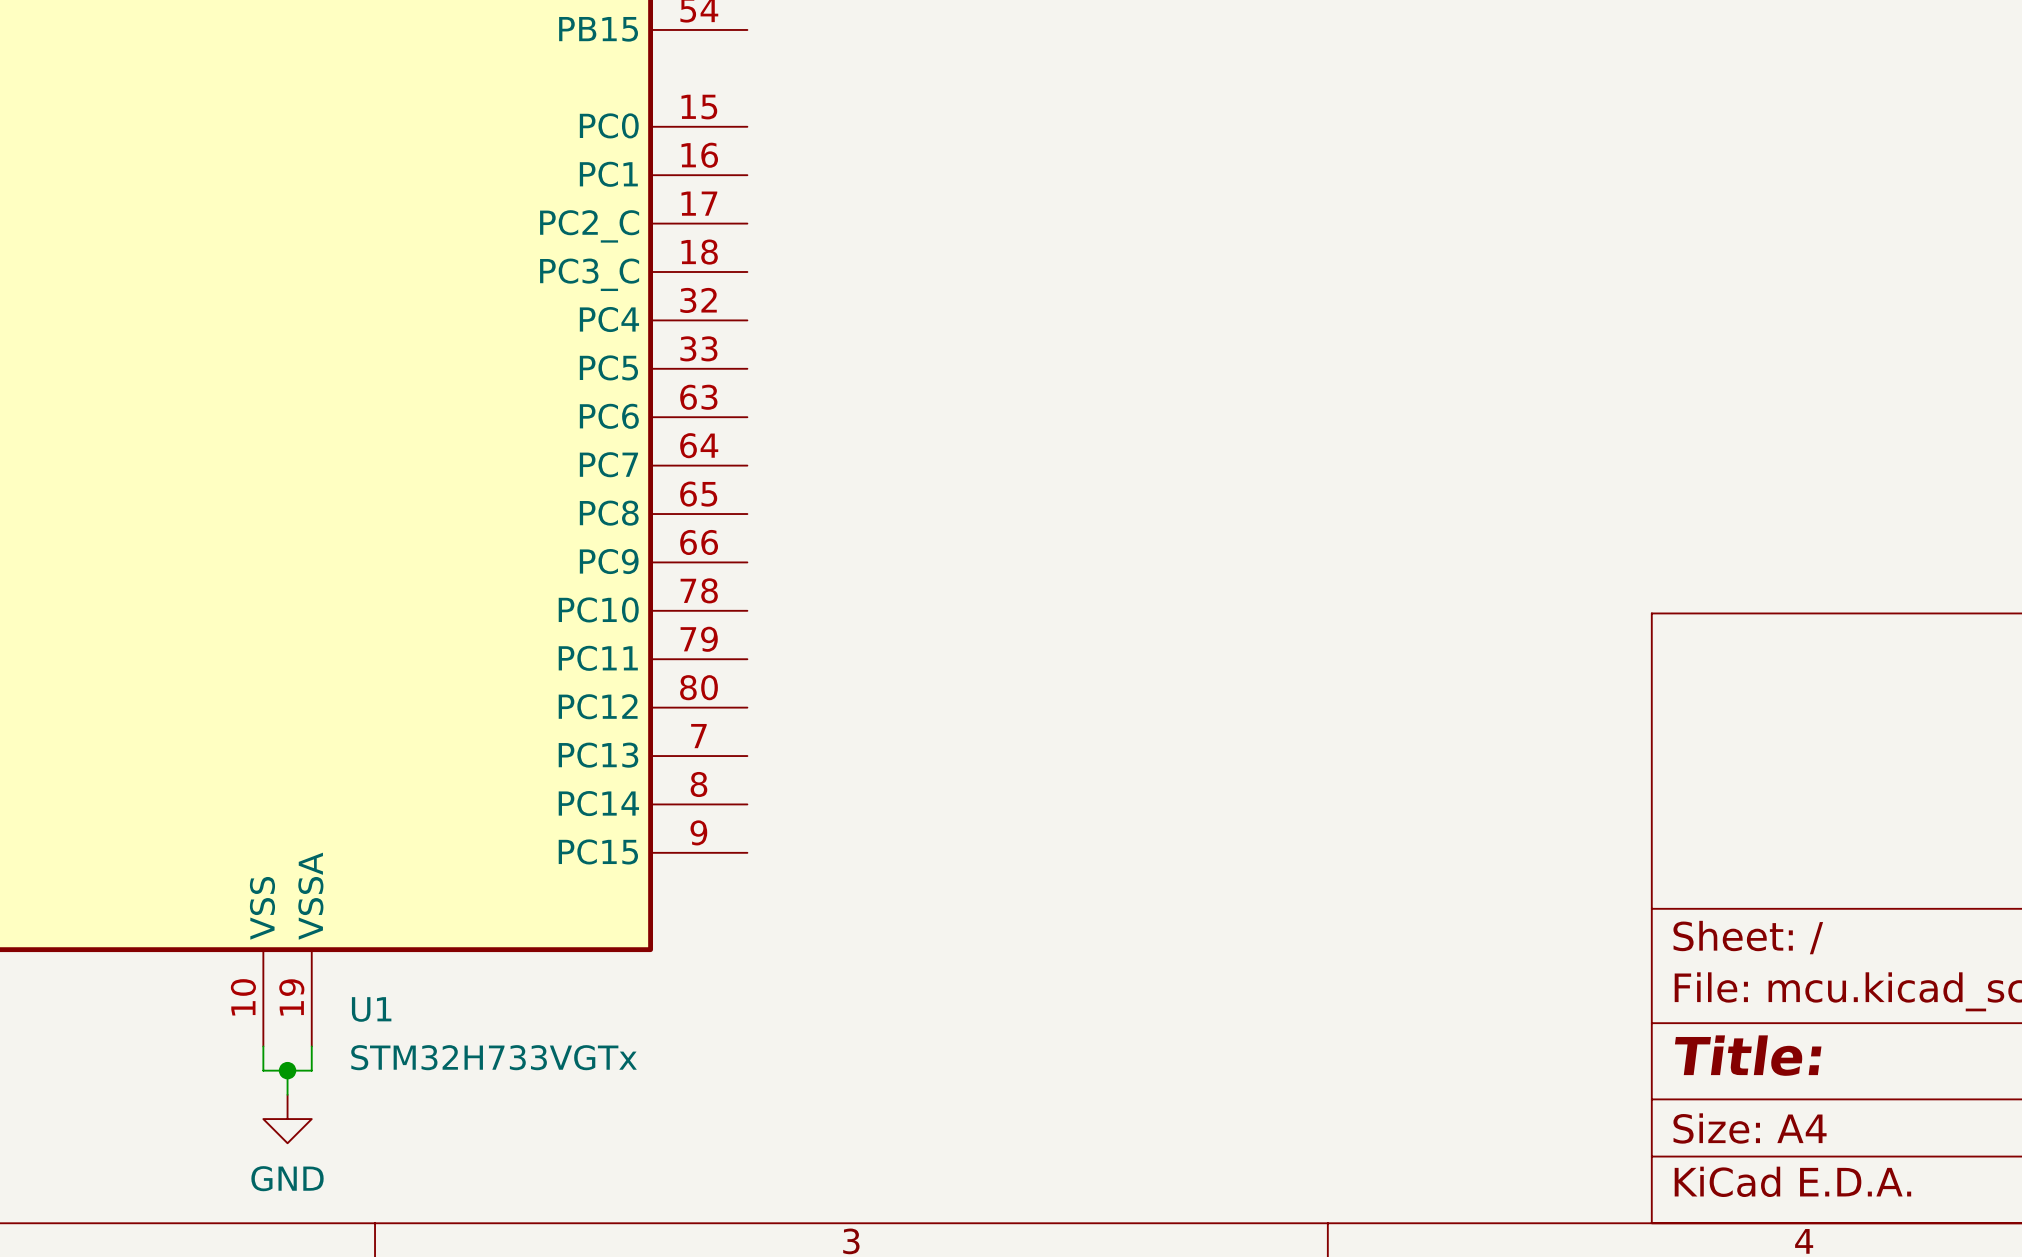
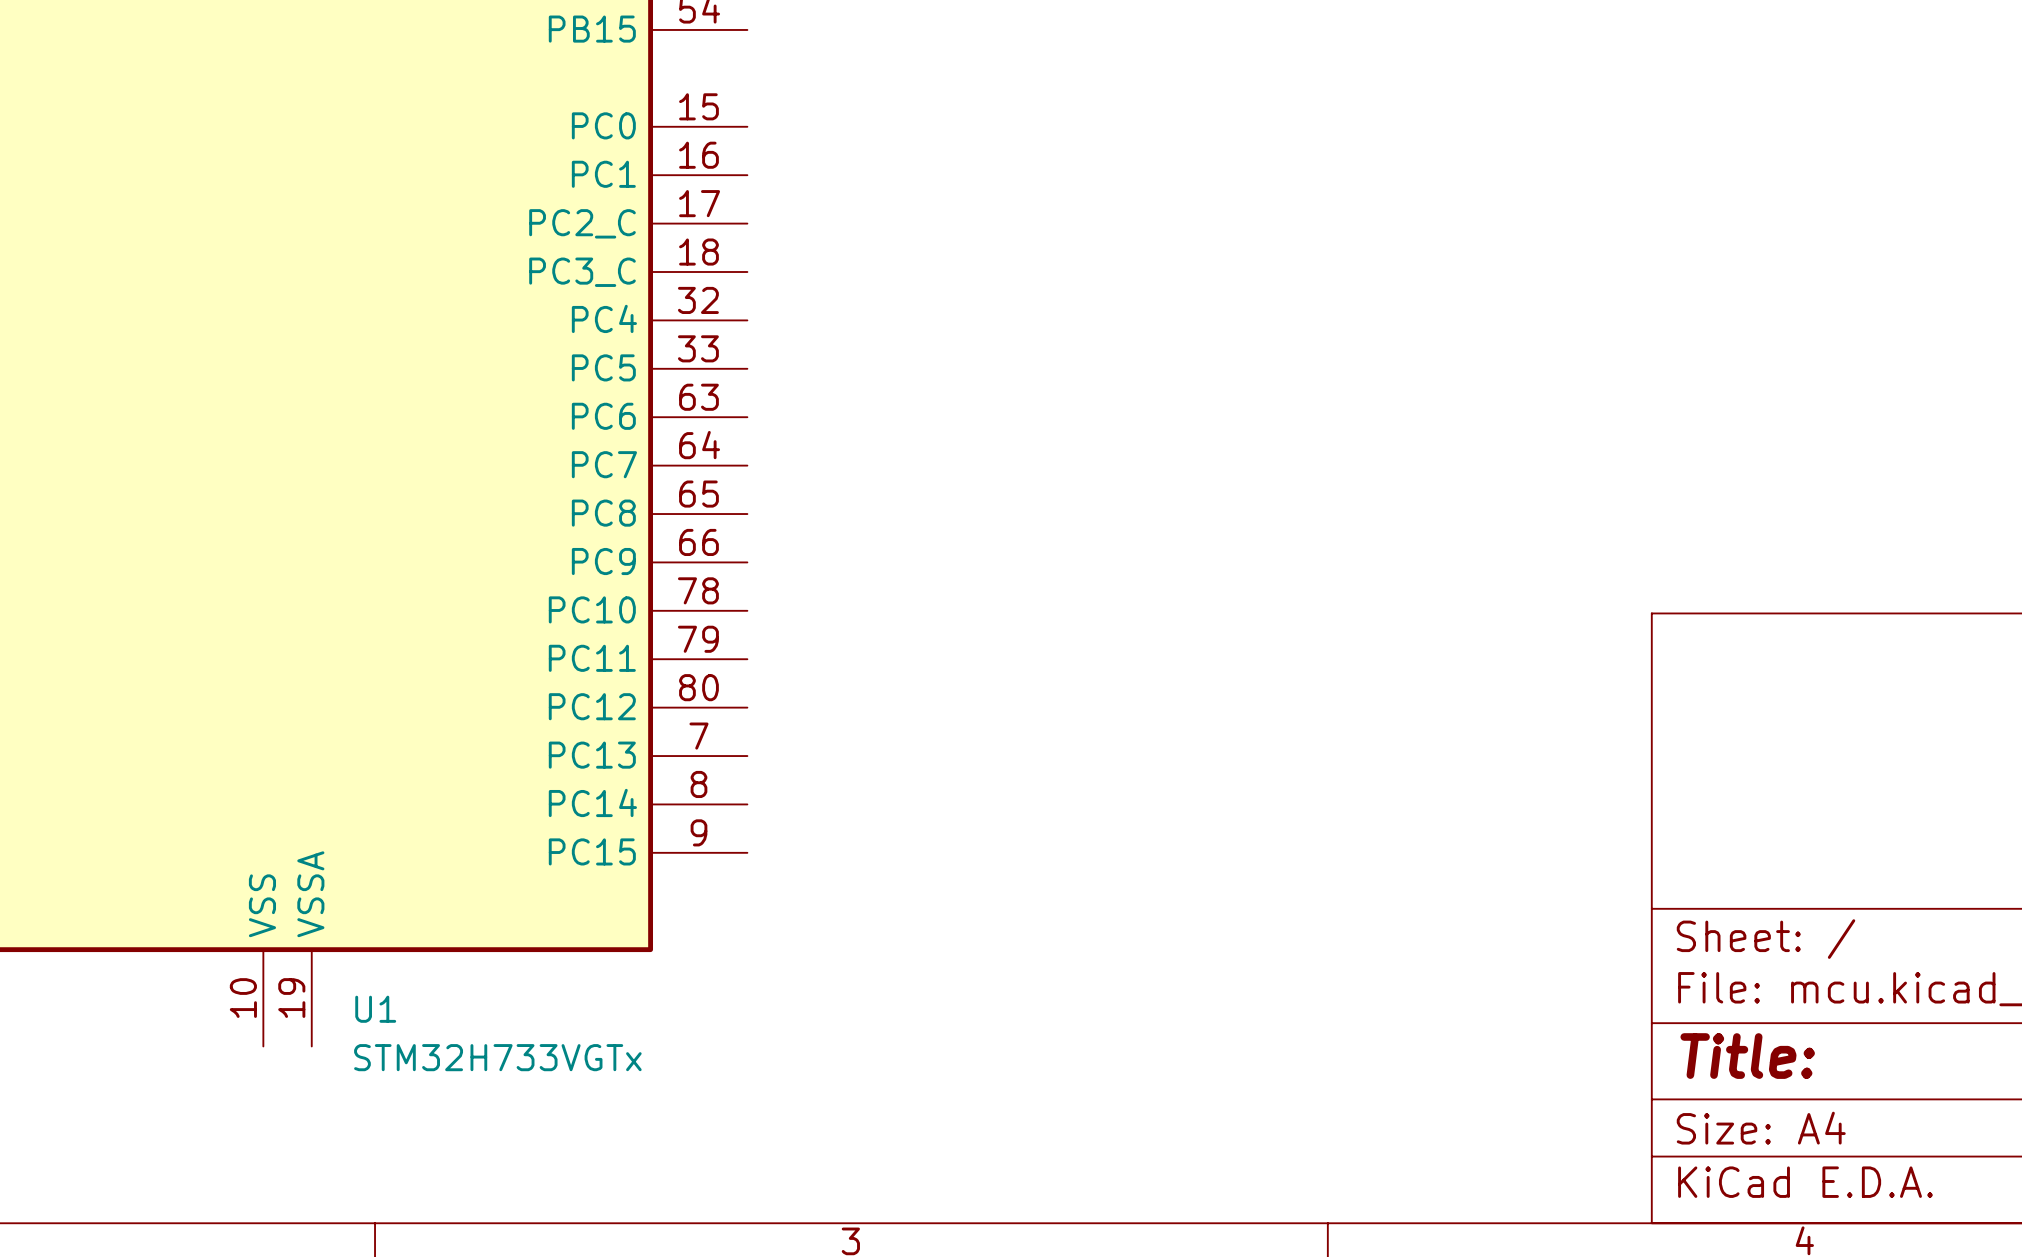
wire: (263, 1046) (263, 1070) (311, 1070) (311, 1046) -> none
wire: (287, 1070) (287, 1094) -> none
junction: (287, 1070) -> none
power symbol: GND (287, 1119) -> none

